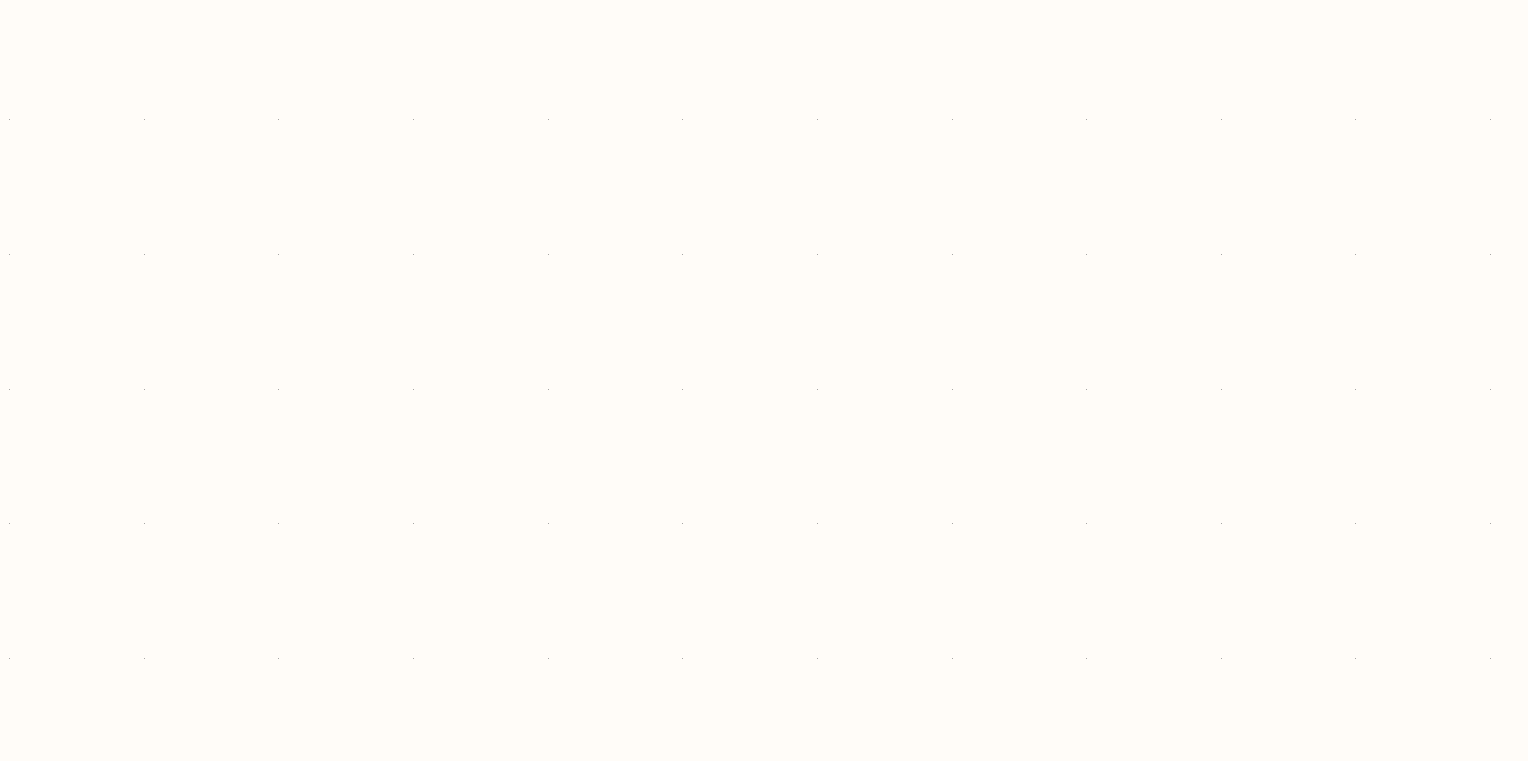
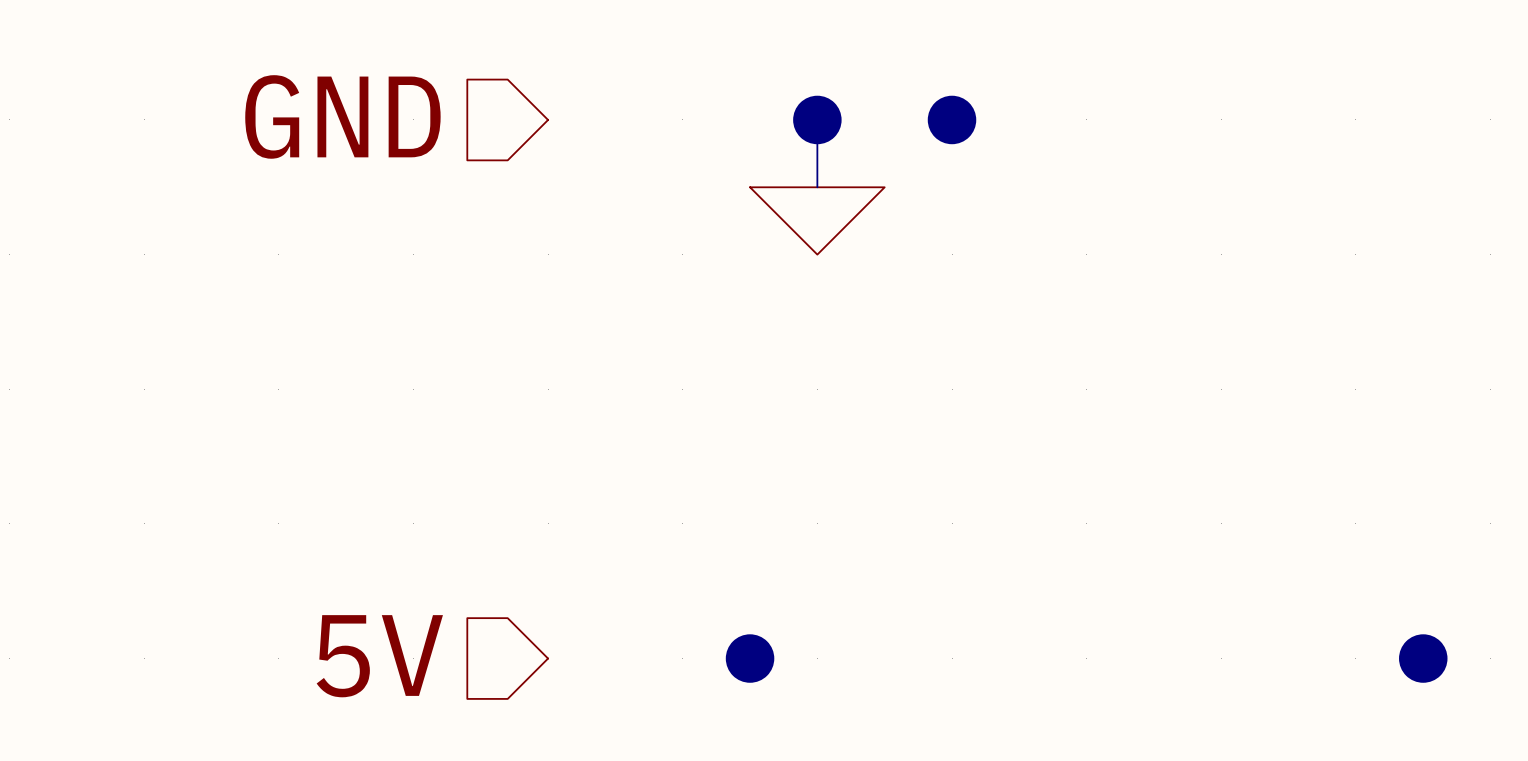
hierarchical label: none -> GND (342, 116)
wire: none -> (817, 119) (817, 187)
junction: none -> (817, 119)
junction: none -> (952, 119)
power symbol: none -> (817, 220)
hierarchical label: none -> 5V (379, 656)
junction: none -> (750, 658)
junction: none -> (1423, 658)

